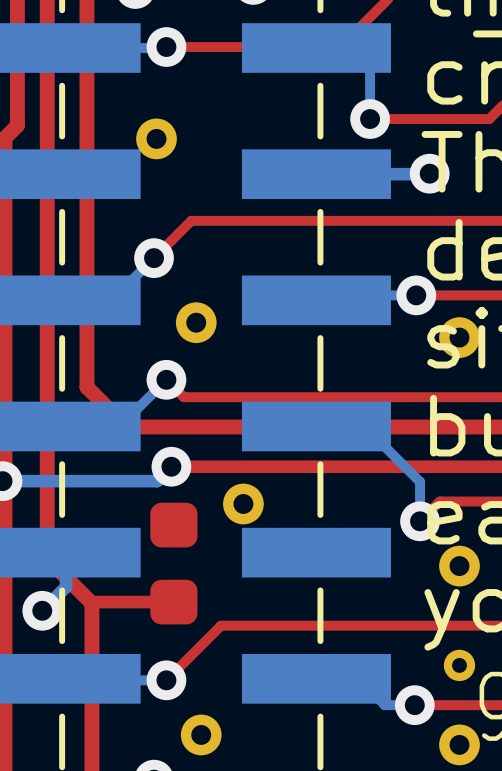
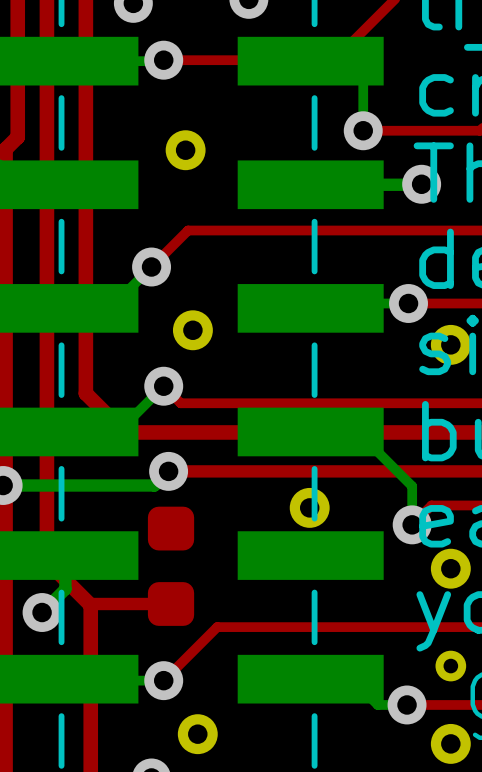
part position: (156, 138) -> (185, 150)
part position: (243, 503) -> (309, 507)

